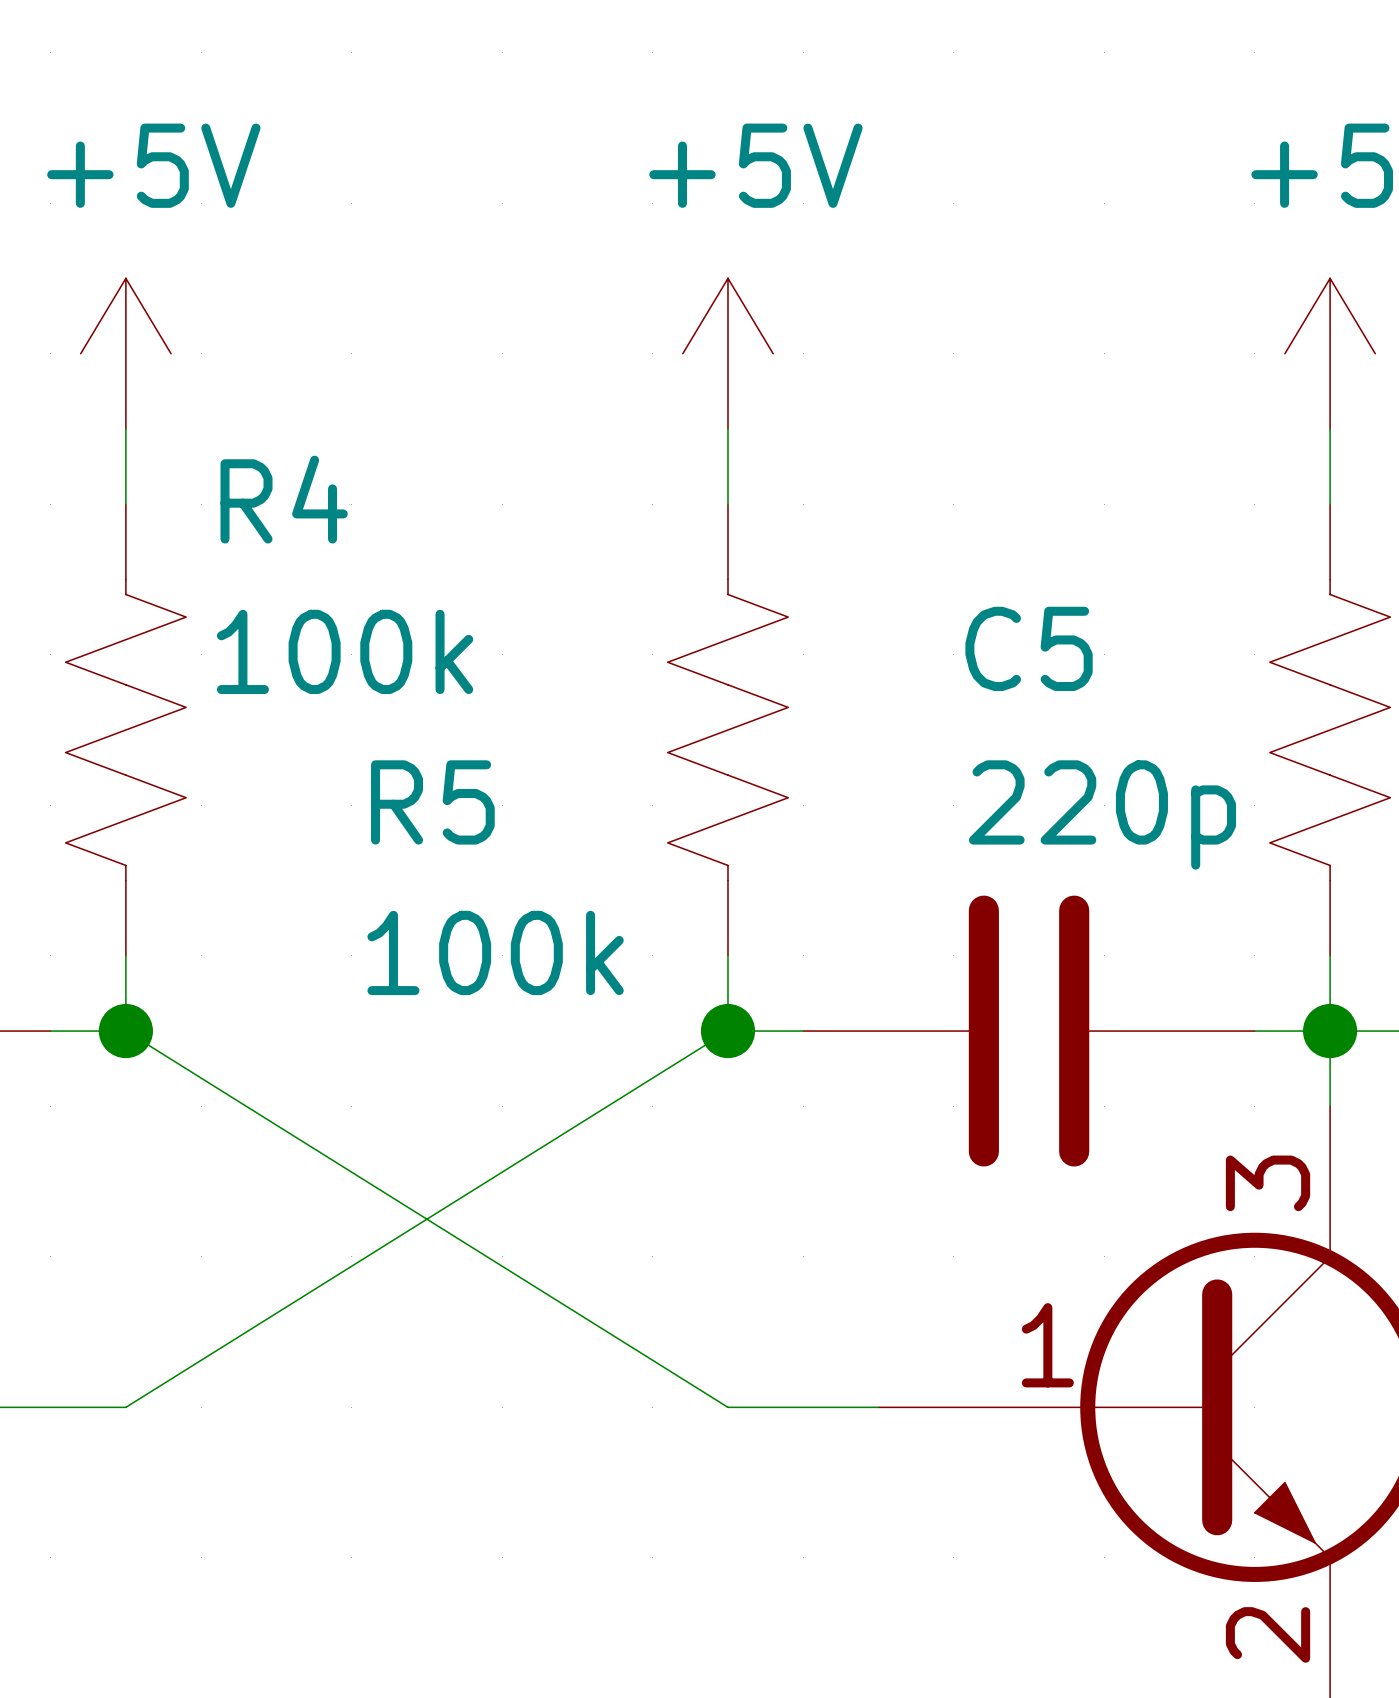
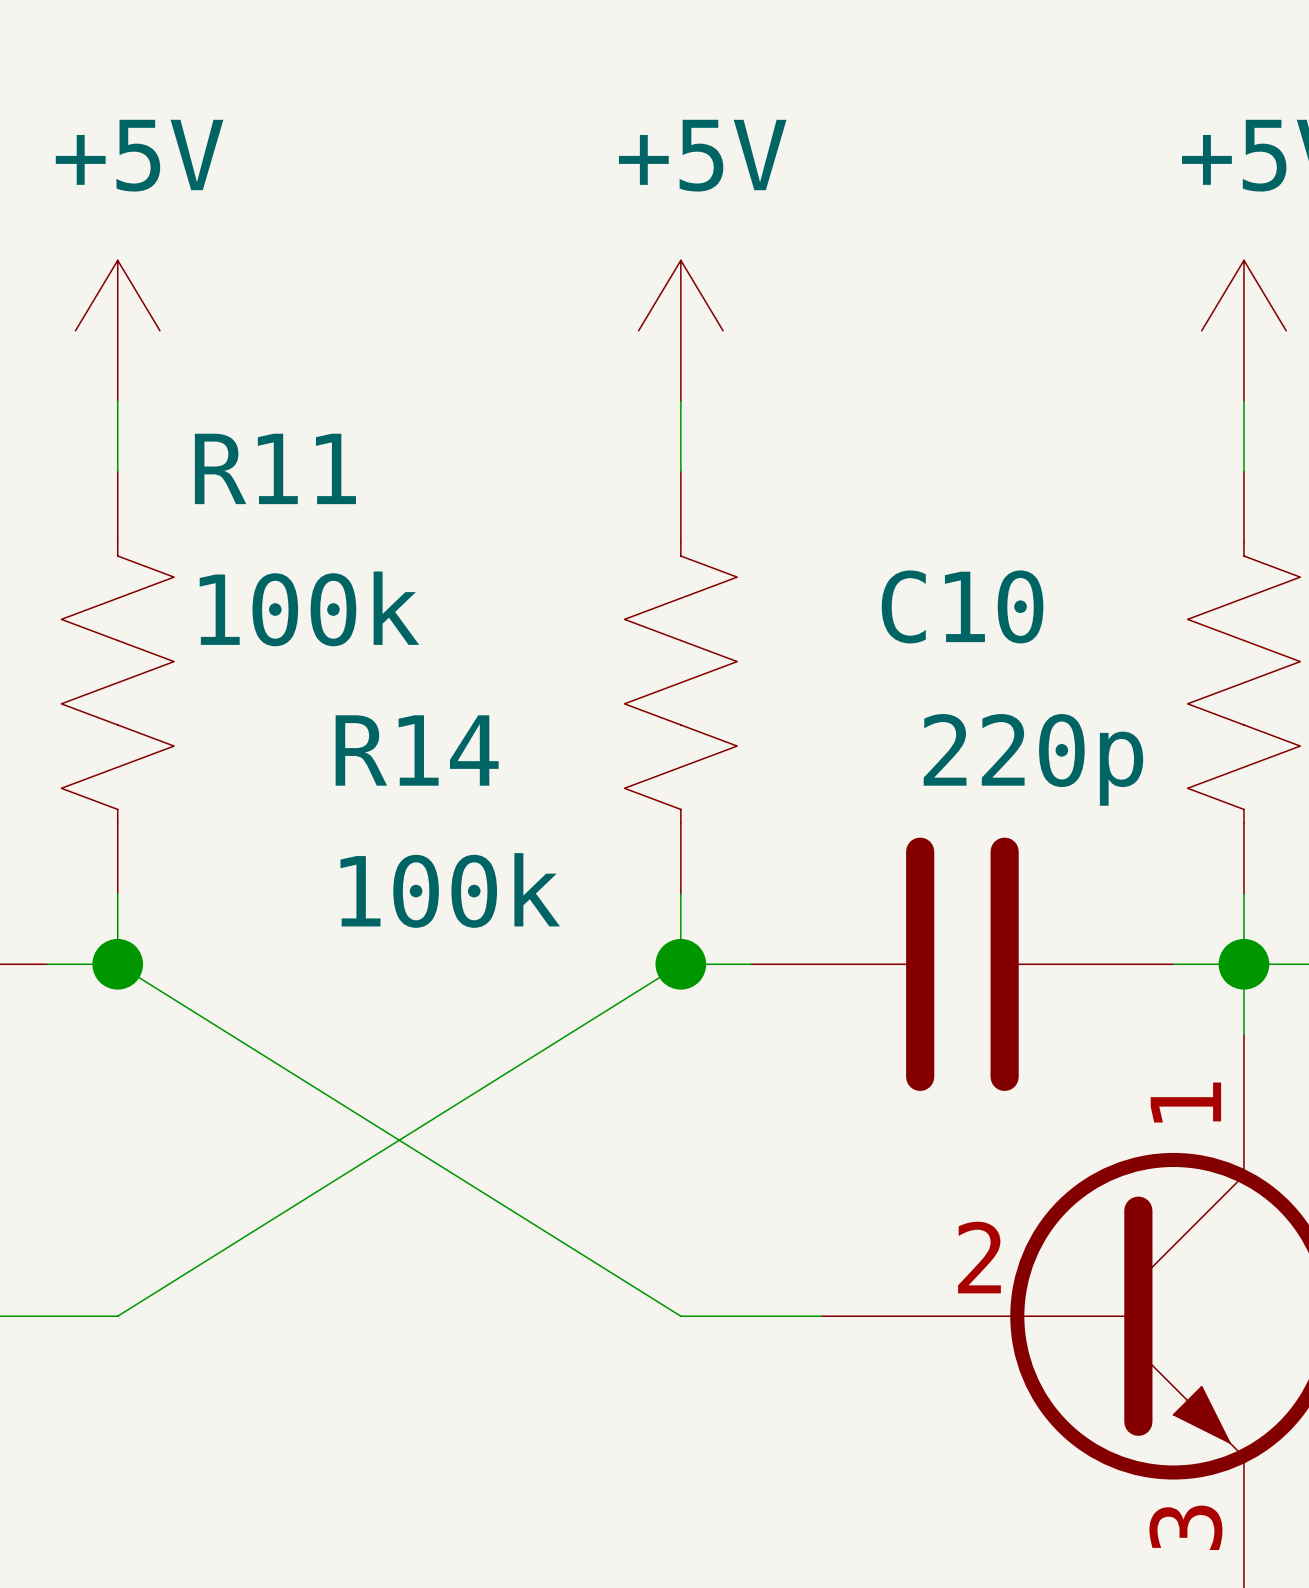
R4 name: R4 (284, 499) -> R11 (275, 468)
C5 name: C5 (1029, 648) -> C10 (962, 606)
R5 name: R5 (432, 802) -> R14 (417, 750)
part pin number: 3 (1268, 1183) -> 1 (1185, 1102)
part pin number: 1 (1047, 1345) -> 2 (979, 1257)
part pin number: 2 (1268, 1634) -> 3 (1185, 1527)

